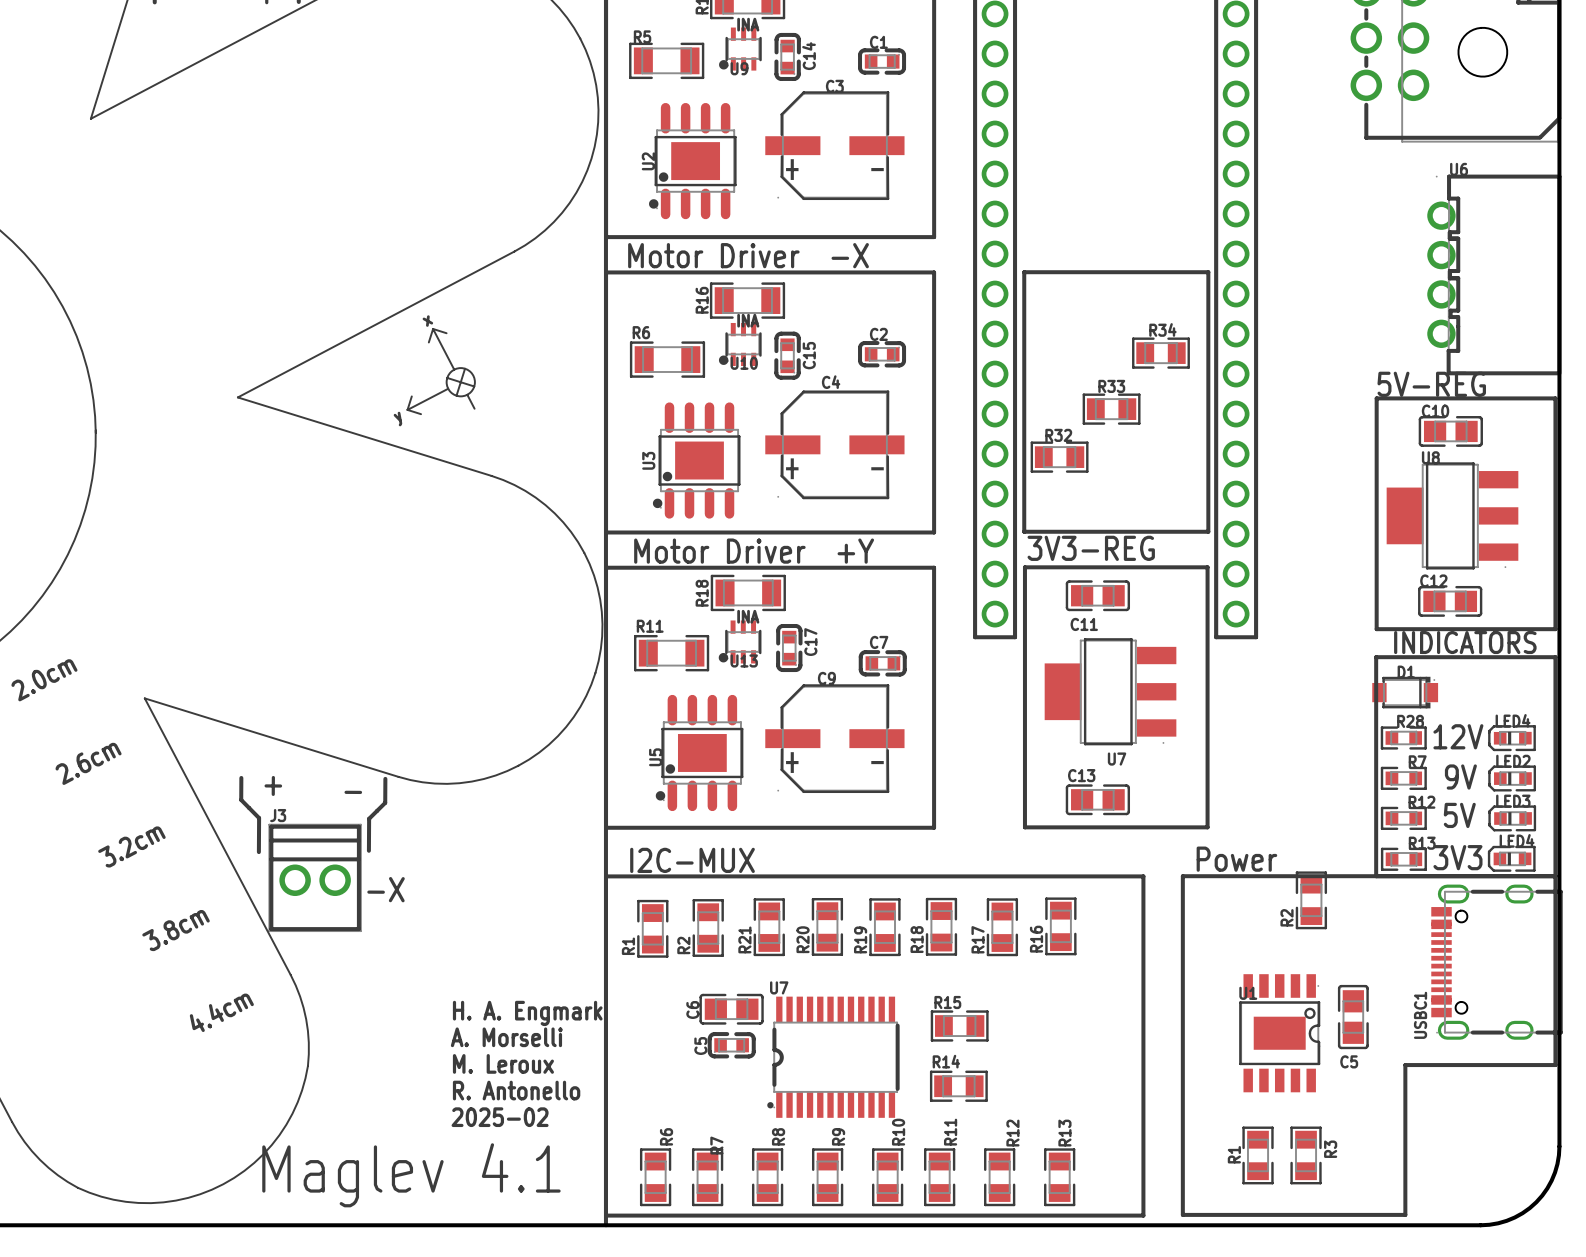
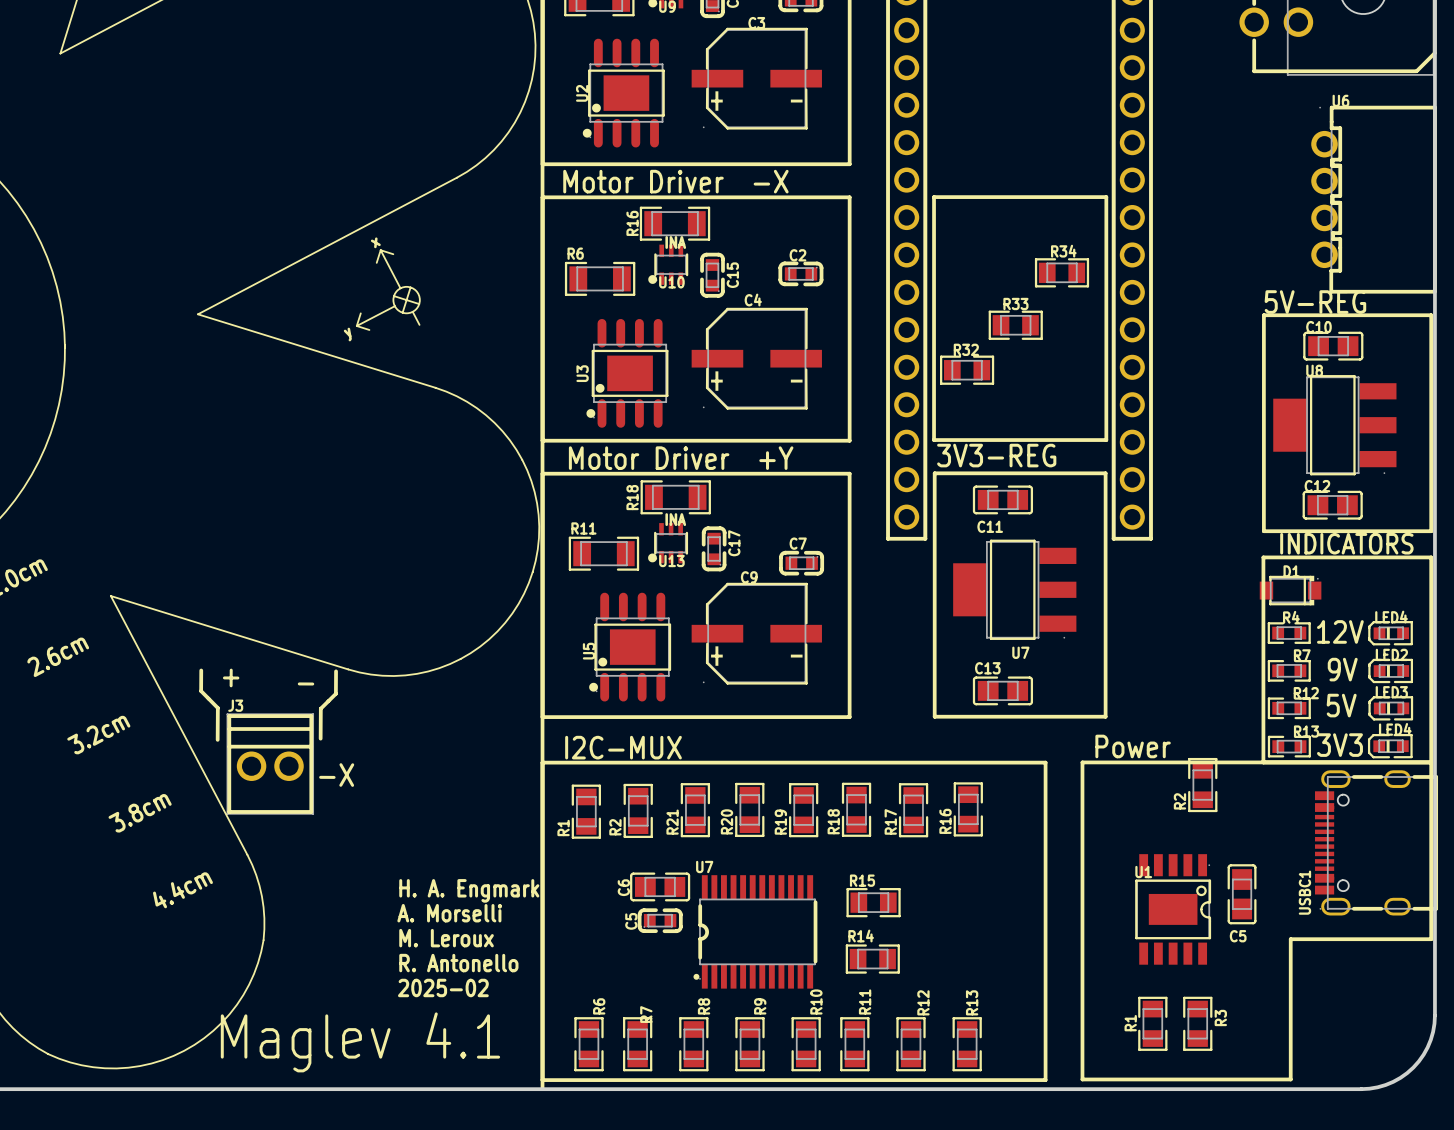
R28 name: R28 (1410, 721) -> R4 (1291, 617)

